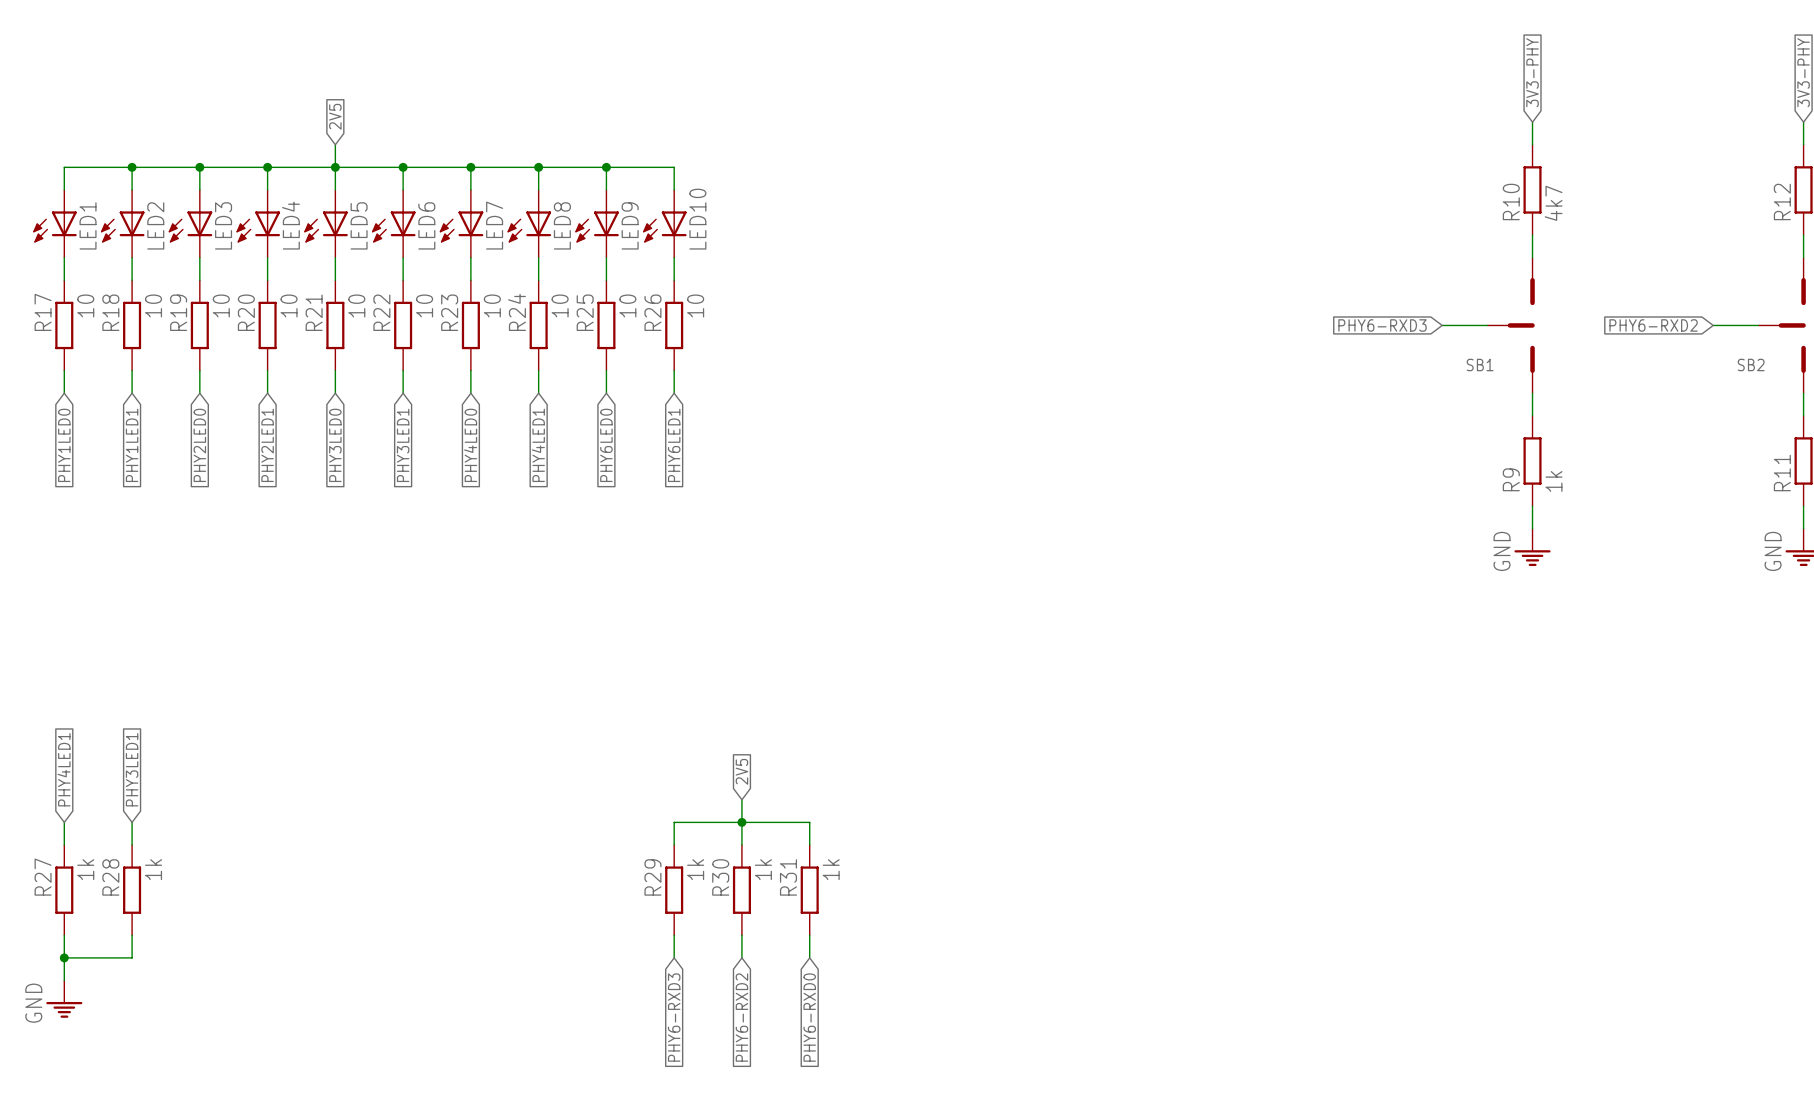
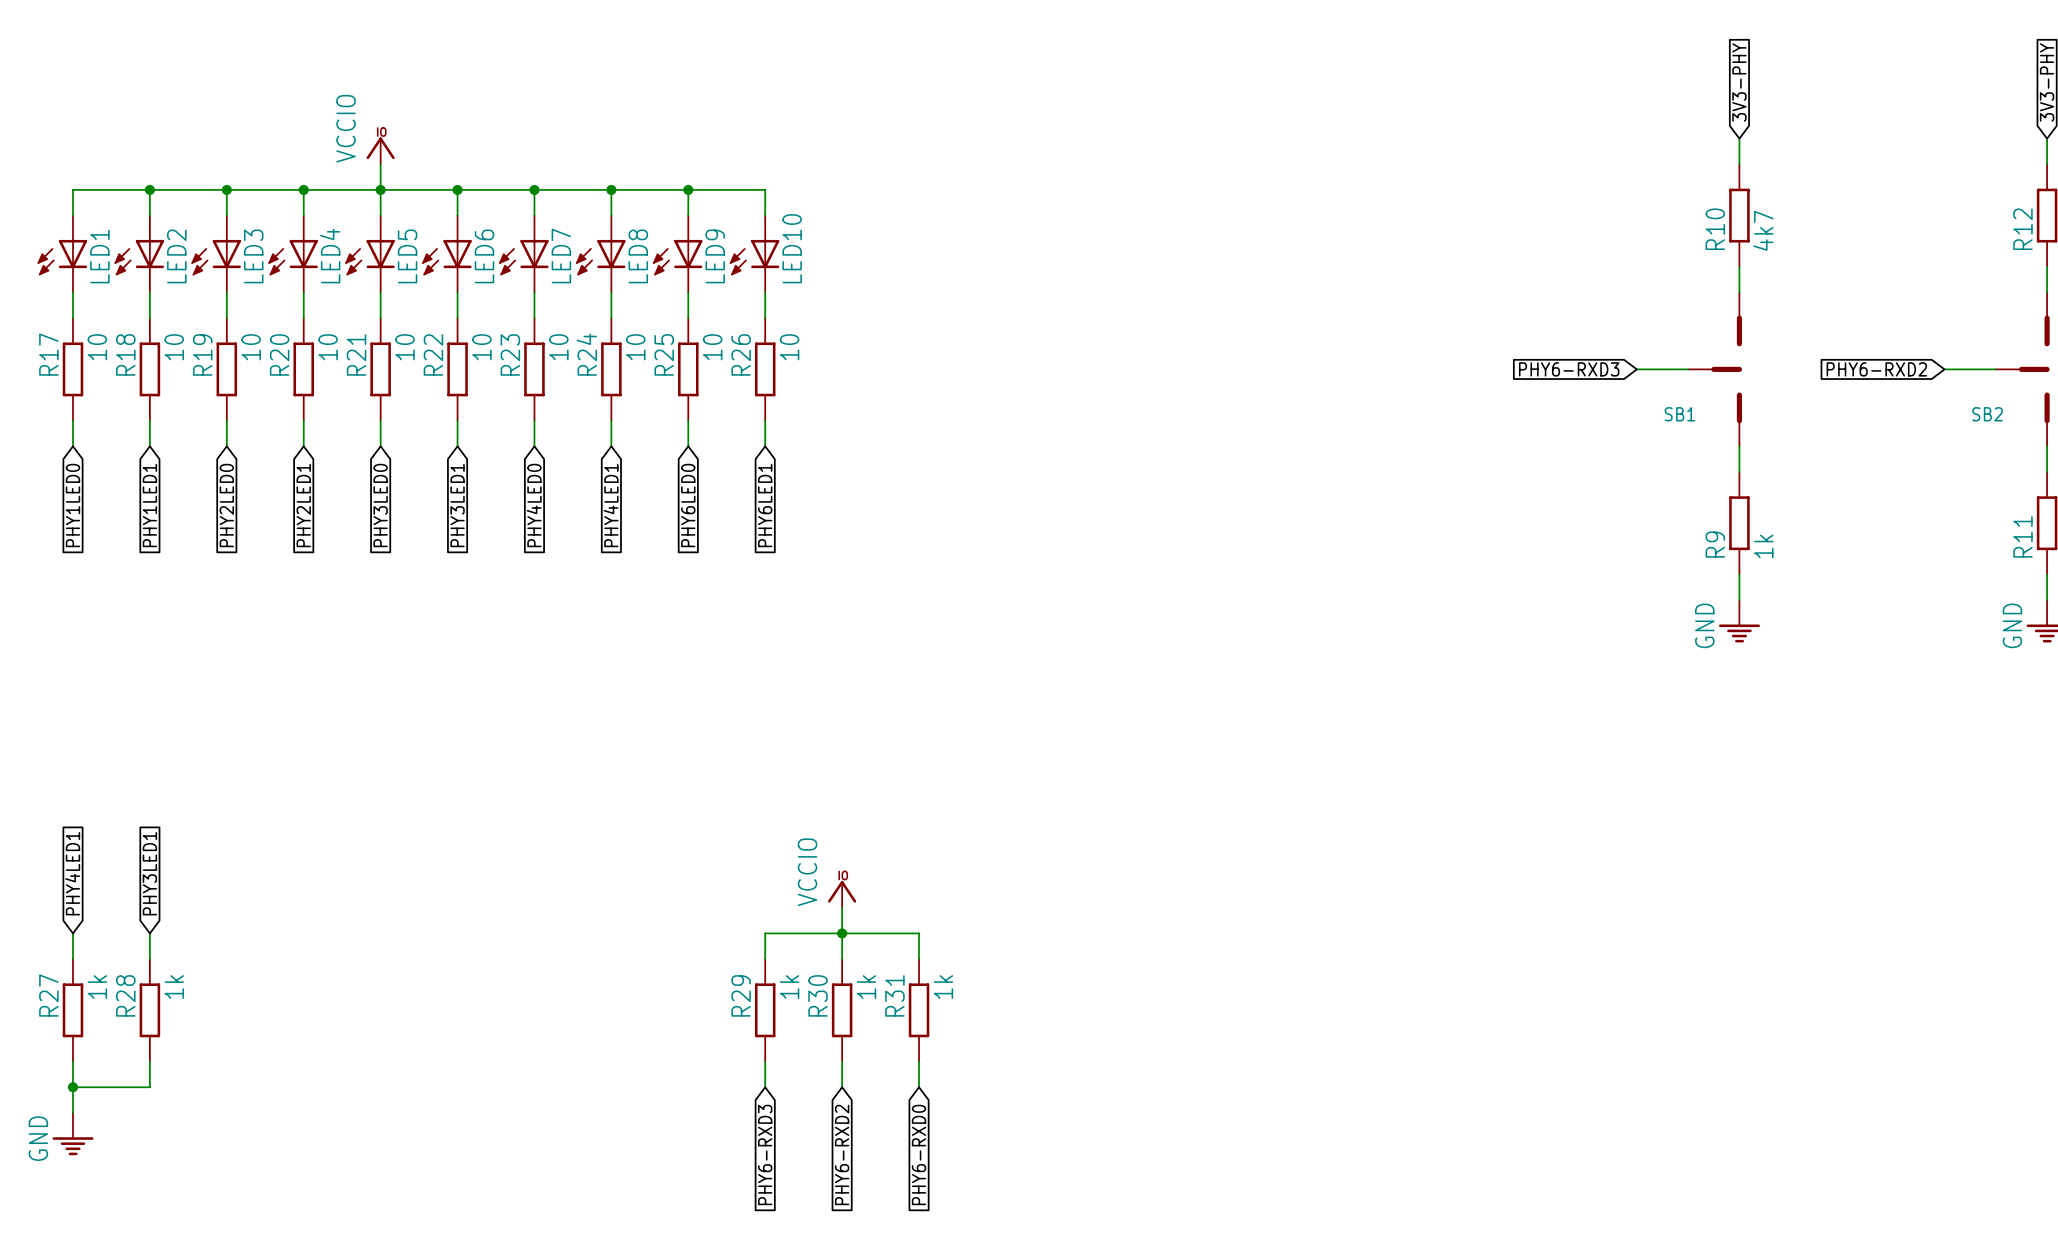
global label: 2V5 (335, 116) -> none
power symbol: none -> VCCIO (380, 150)
global label: 2V5 (741, 771) -> none
power symbol: none -> VCCIO (842, 894)

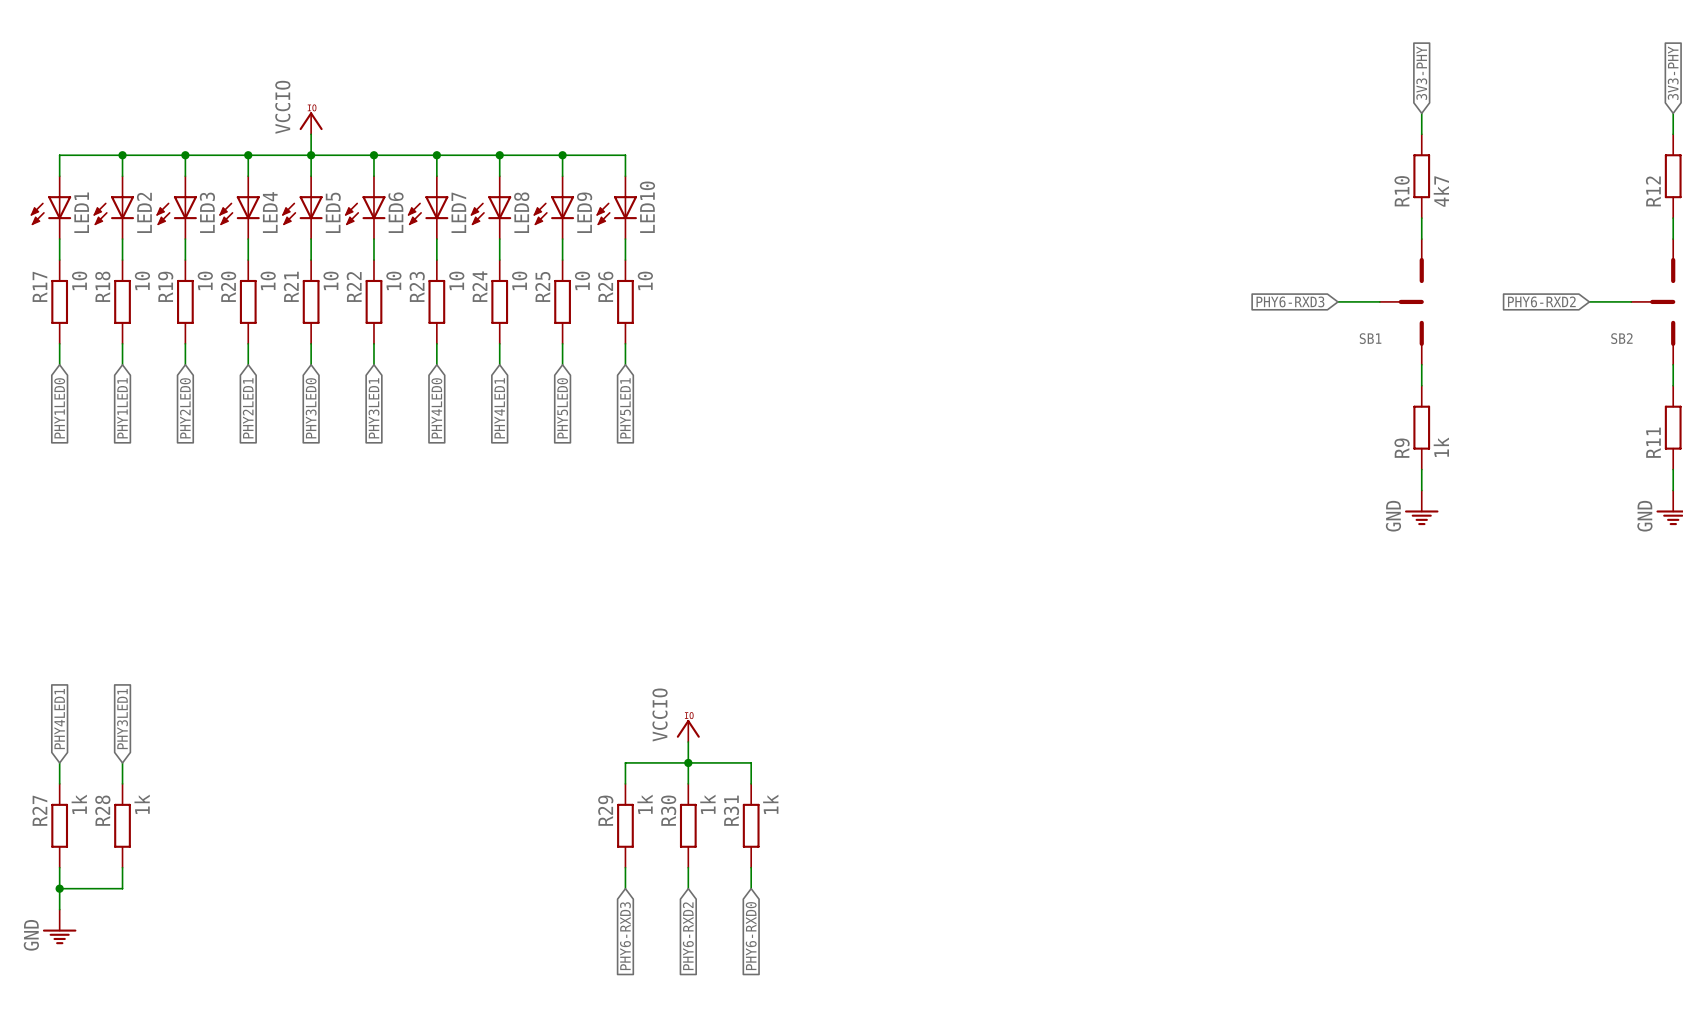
global label: PHY6LED0 (688, 505) -> PHY5LED0 (562, 408)
global label: PHY6LED1 (765, 505) -> PHY5LED1 (625, 408)

